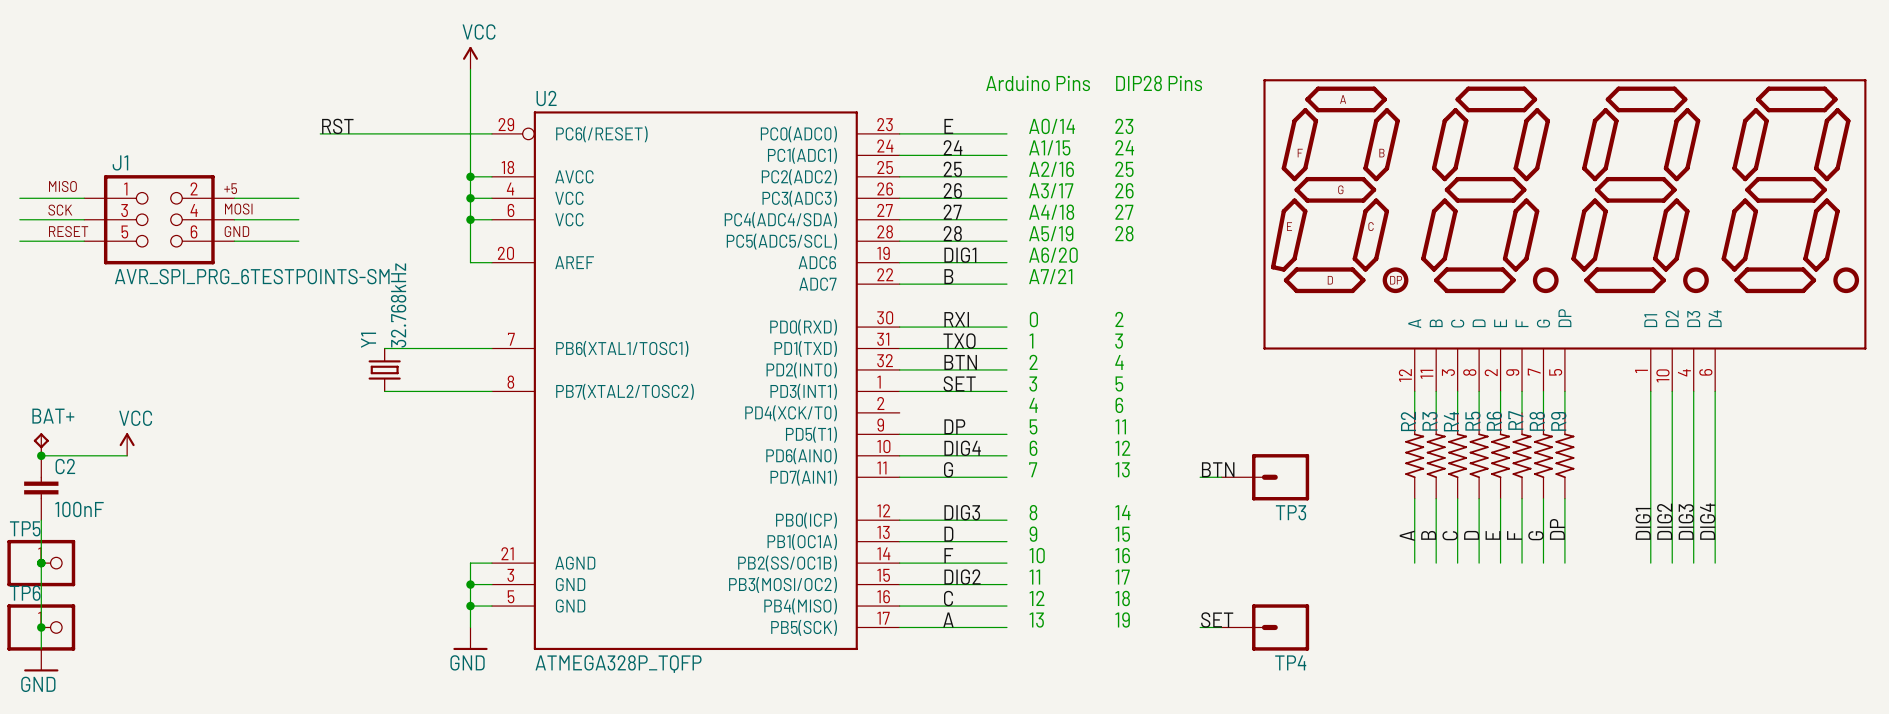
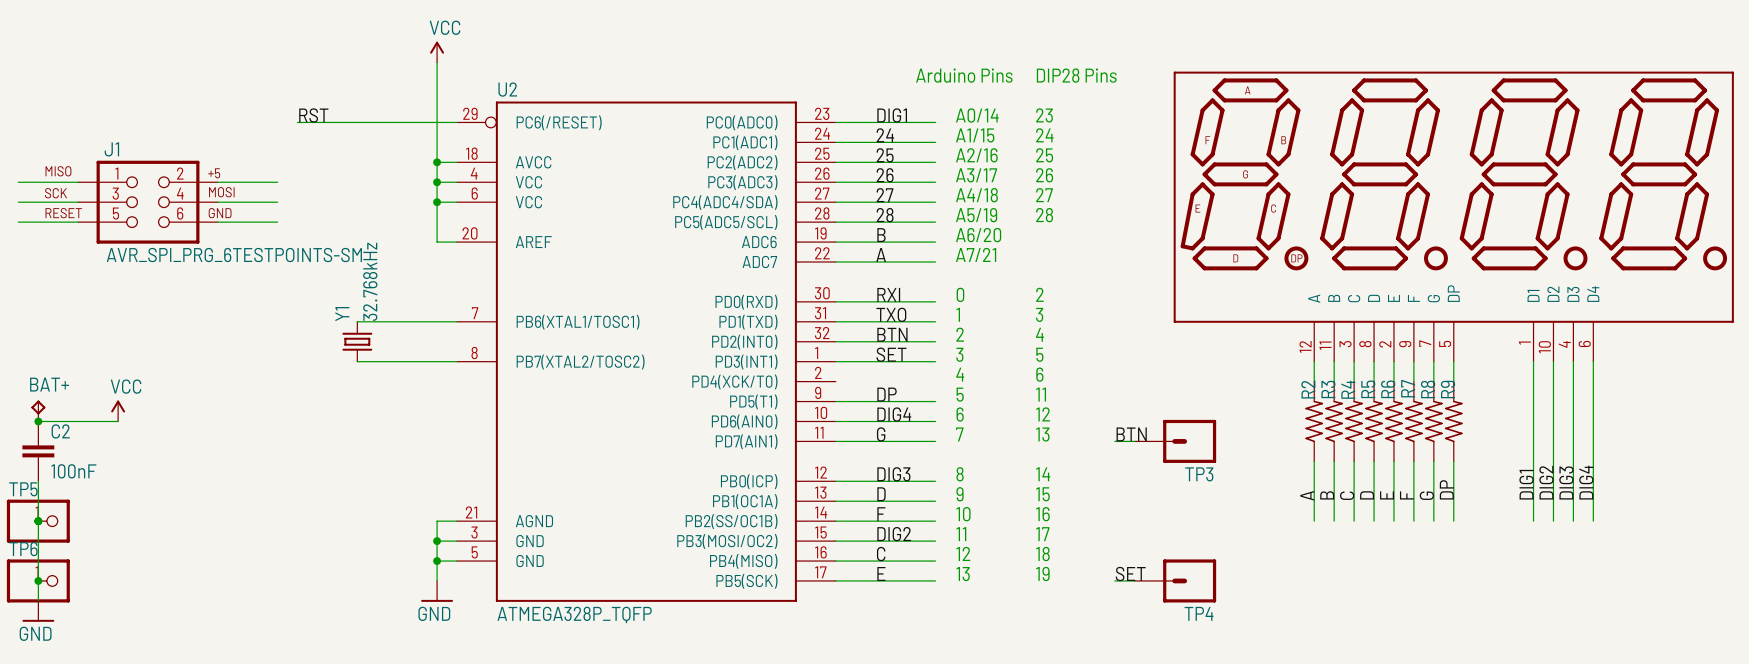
label: E (948, 126) -> DIG1 (892, 115)
label: DIG1 (960, 255) -> B (881, 235)
label: B (948, 276) -> A (881, 255)
label: A (948, 619) -> E (881, 573)

